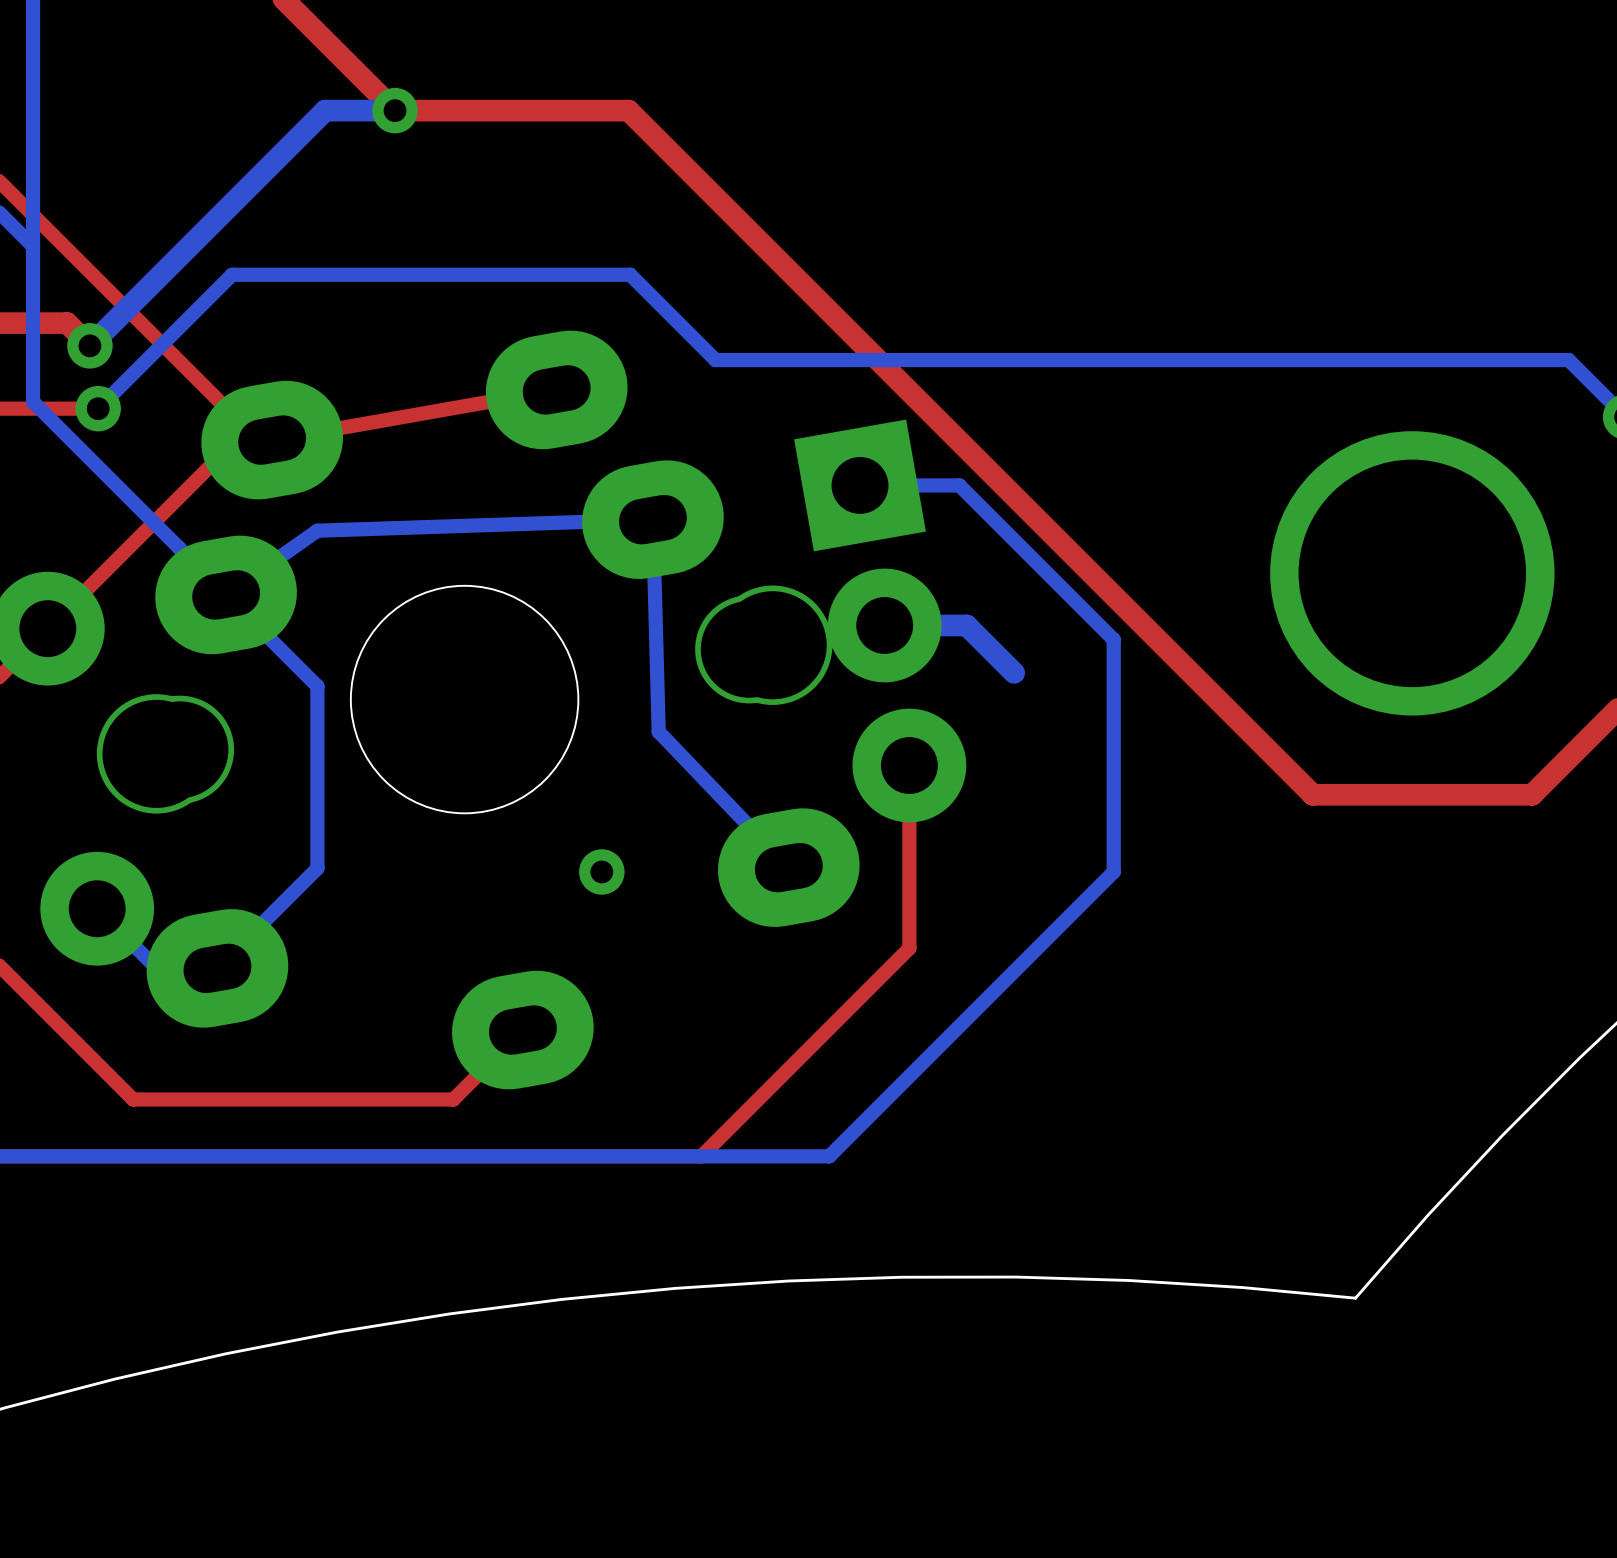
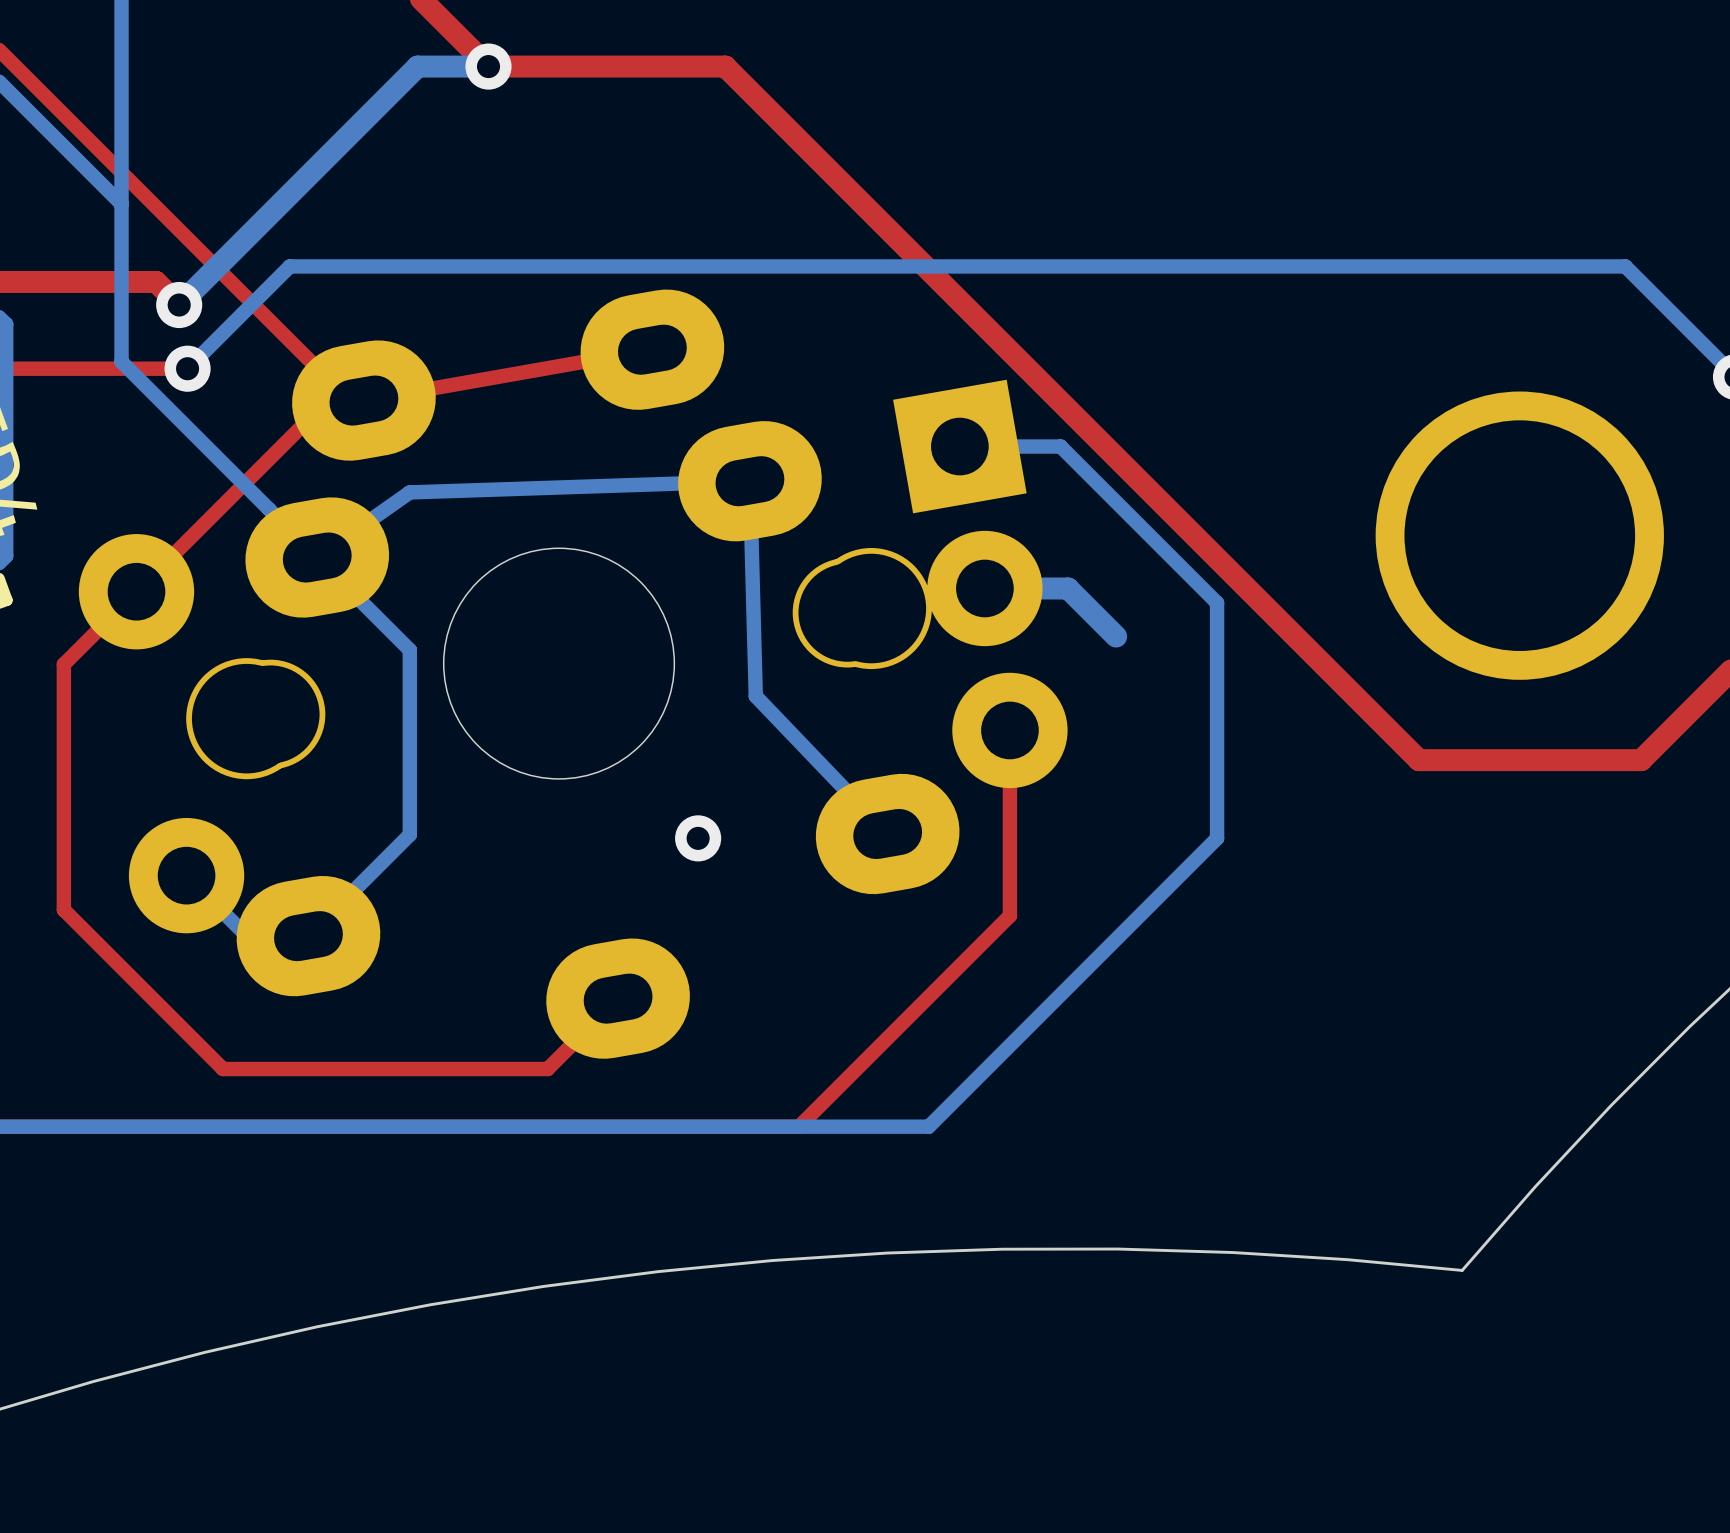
bottom track: (199, 307) (232, 274) (630, 274) (715, 360) (1568, 360) -> (289, 266) (1625, 266) (1678, 319)

